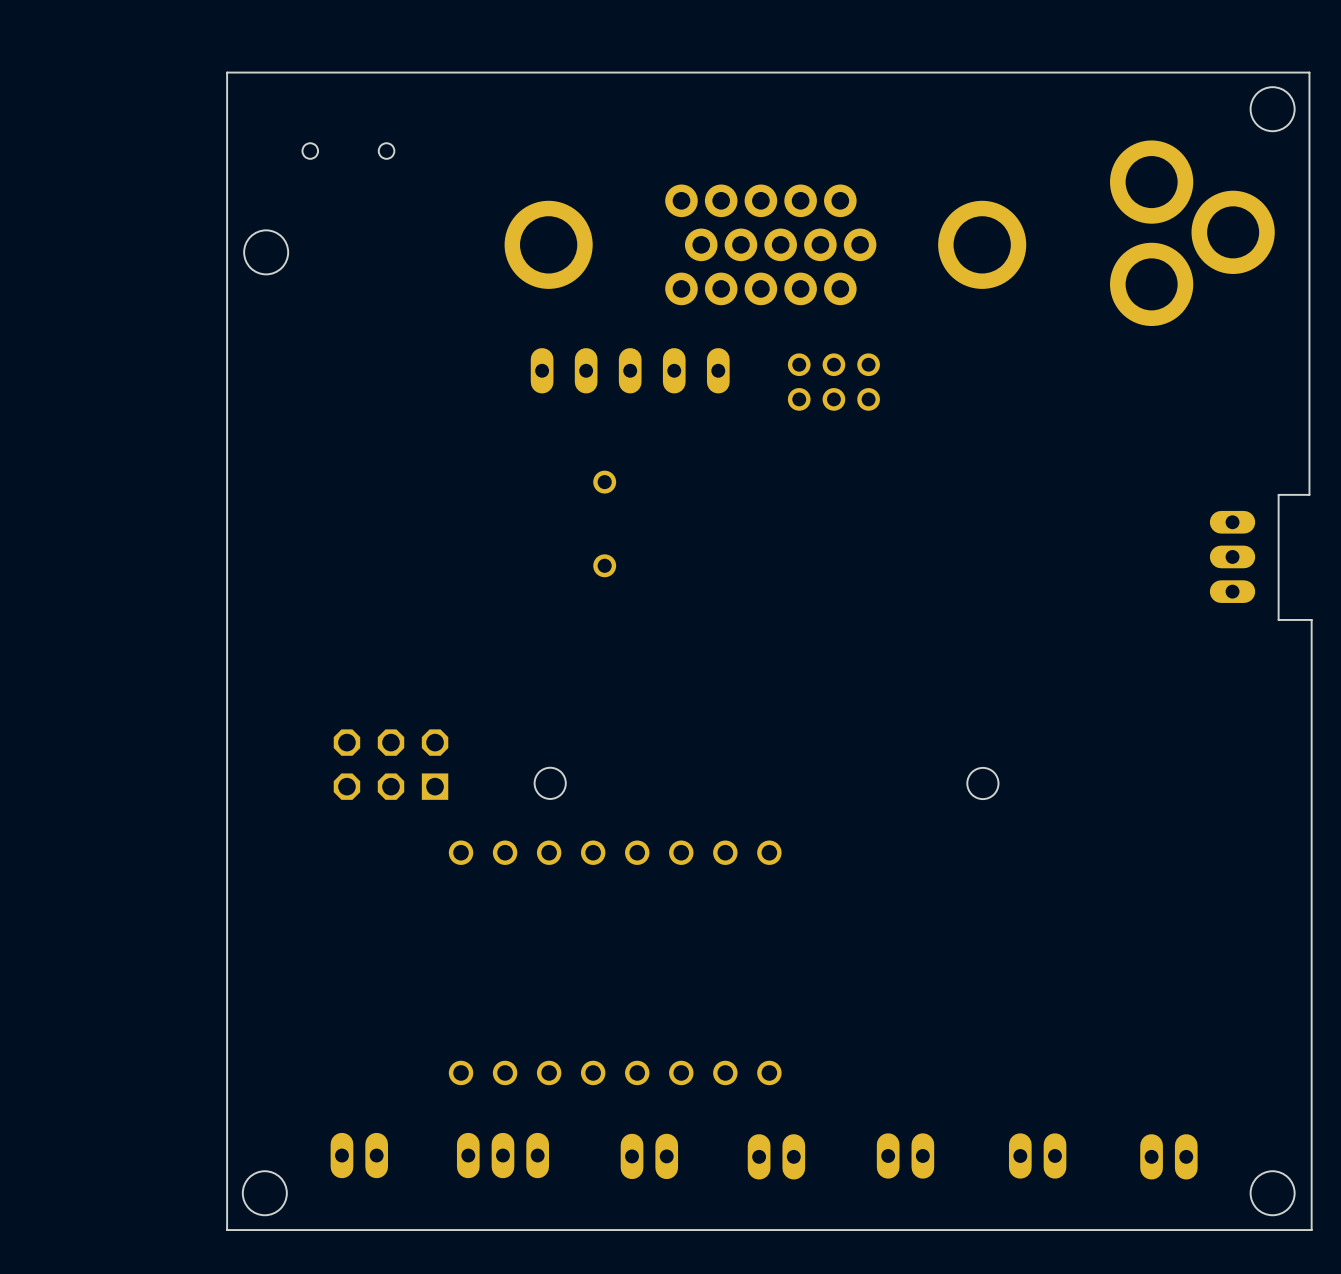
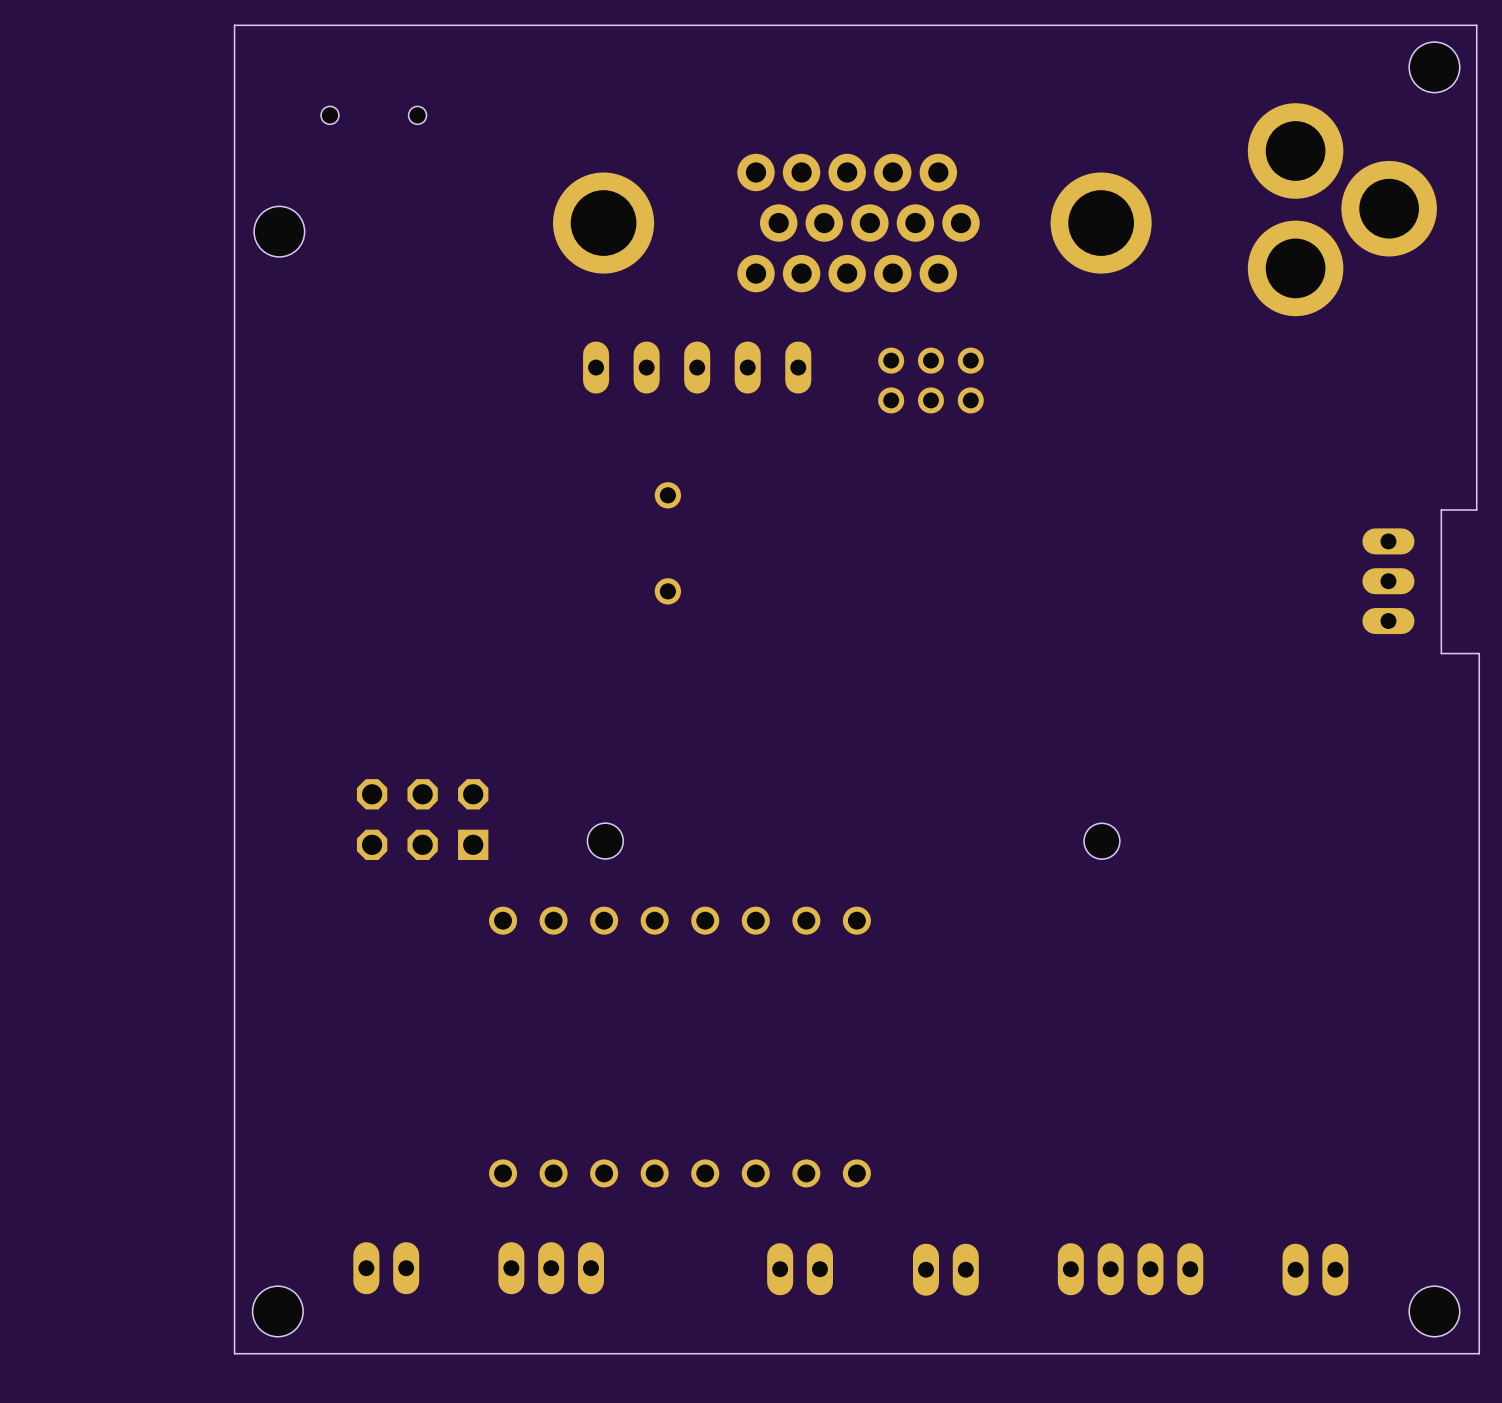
part: (905, 1155) -> none
part: (1037, 1155) -> none
part: (649, 1156) -> none
part: none -> (800, 1269)
part: (776, 1156) -> none
part: none -> (945, 1269)
part: none -> (1130, 1269)

